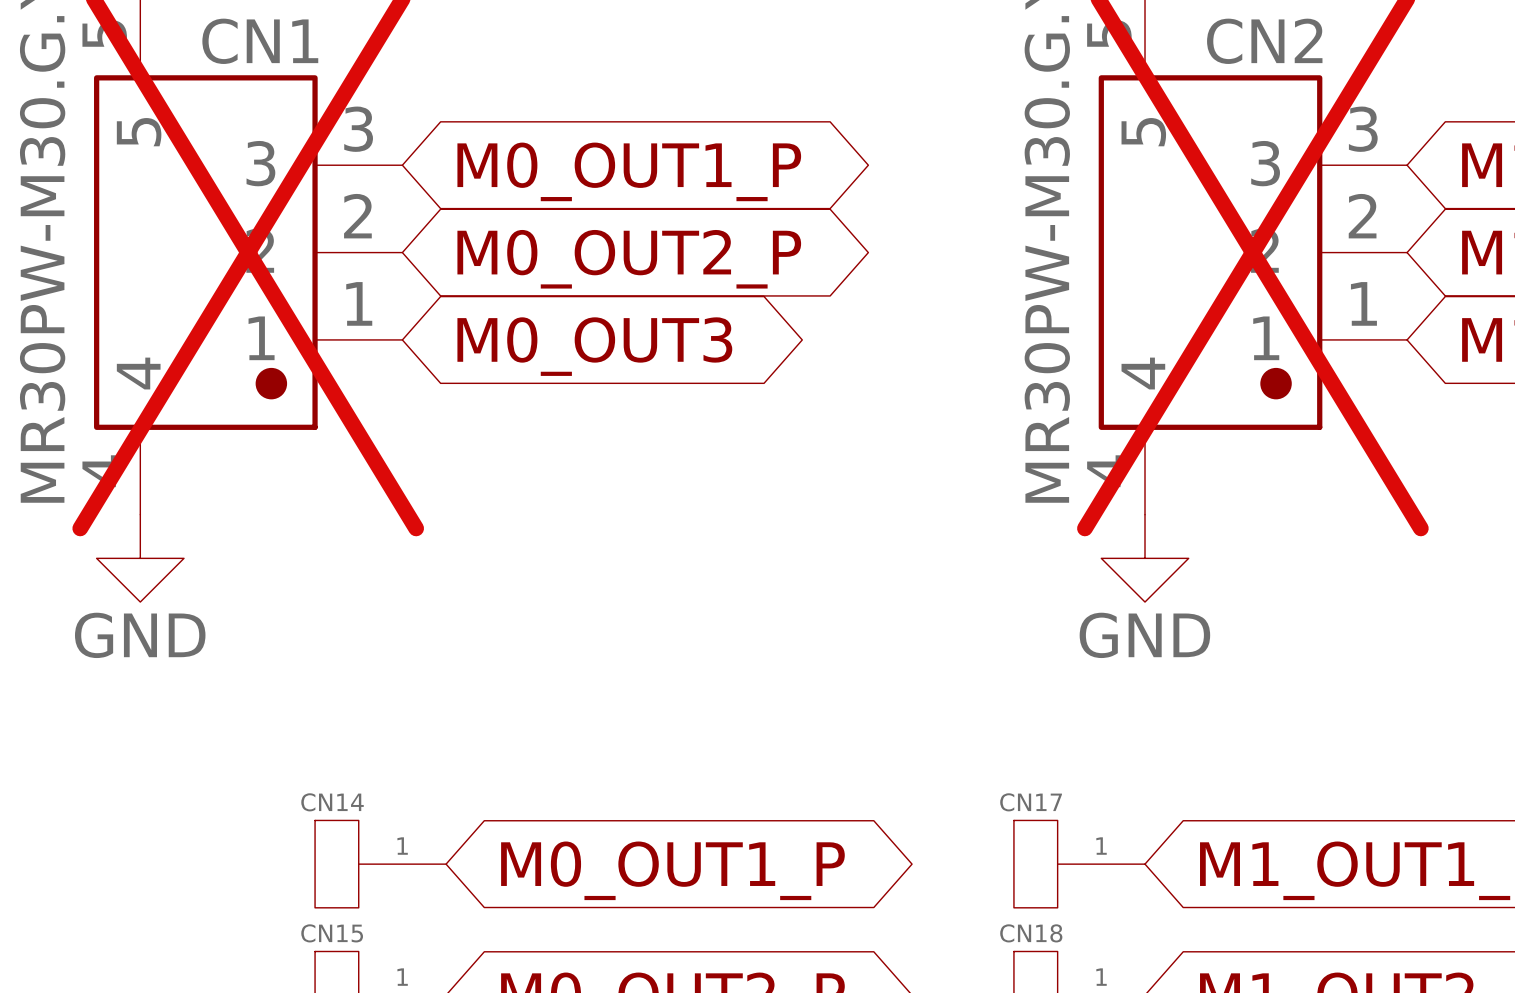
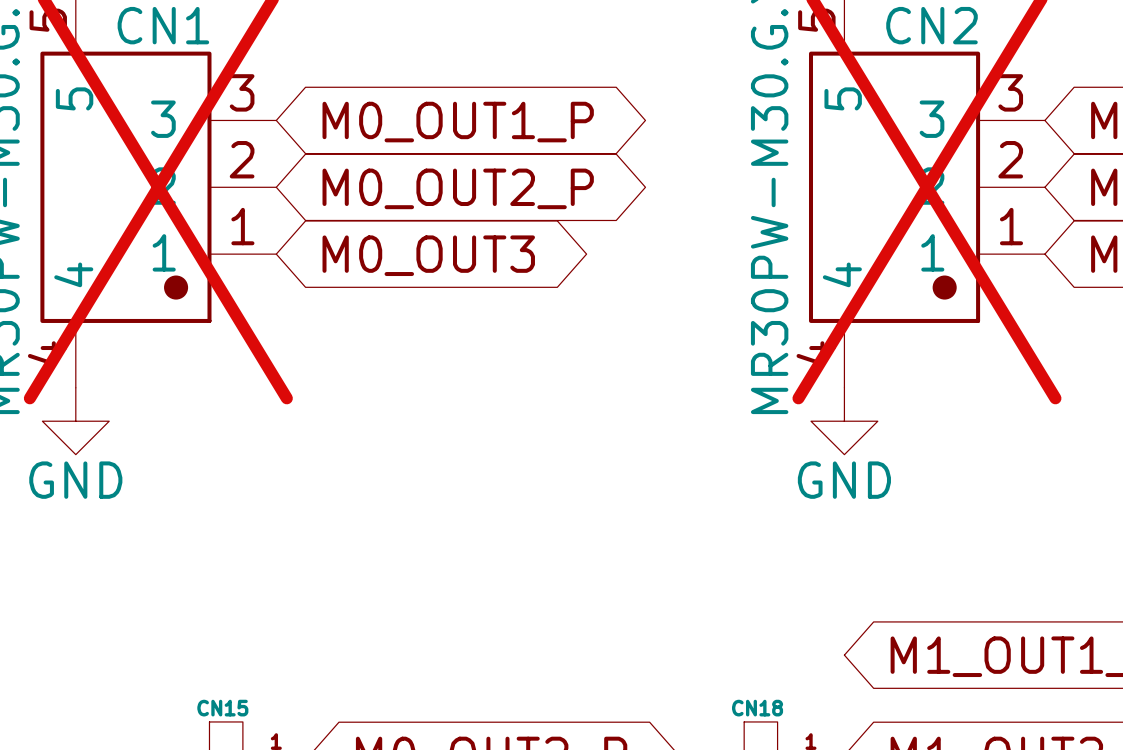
CN14: (380, 864) -> none
CN17: (1079, 864) -> none
global label: M0_OUT1_P (672, 870) -> none

